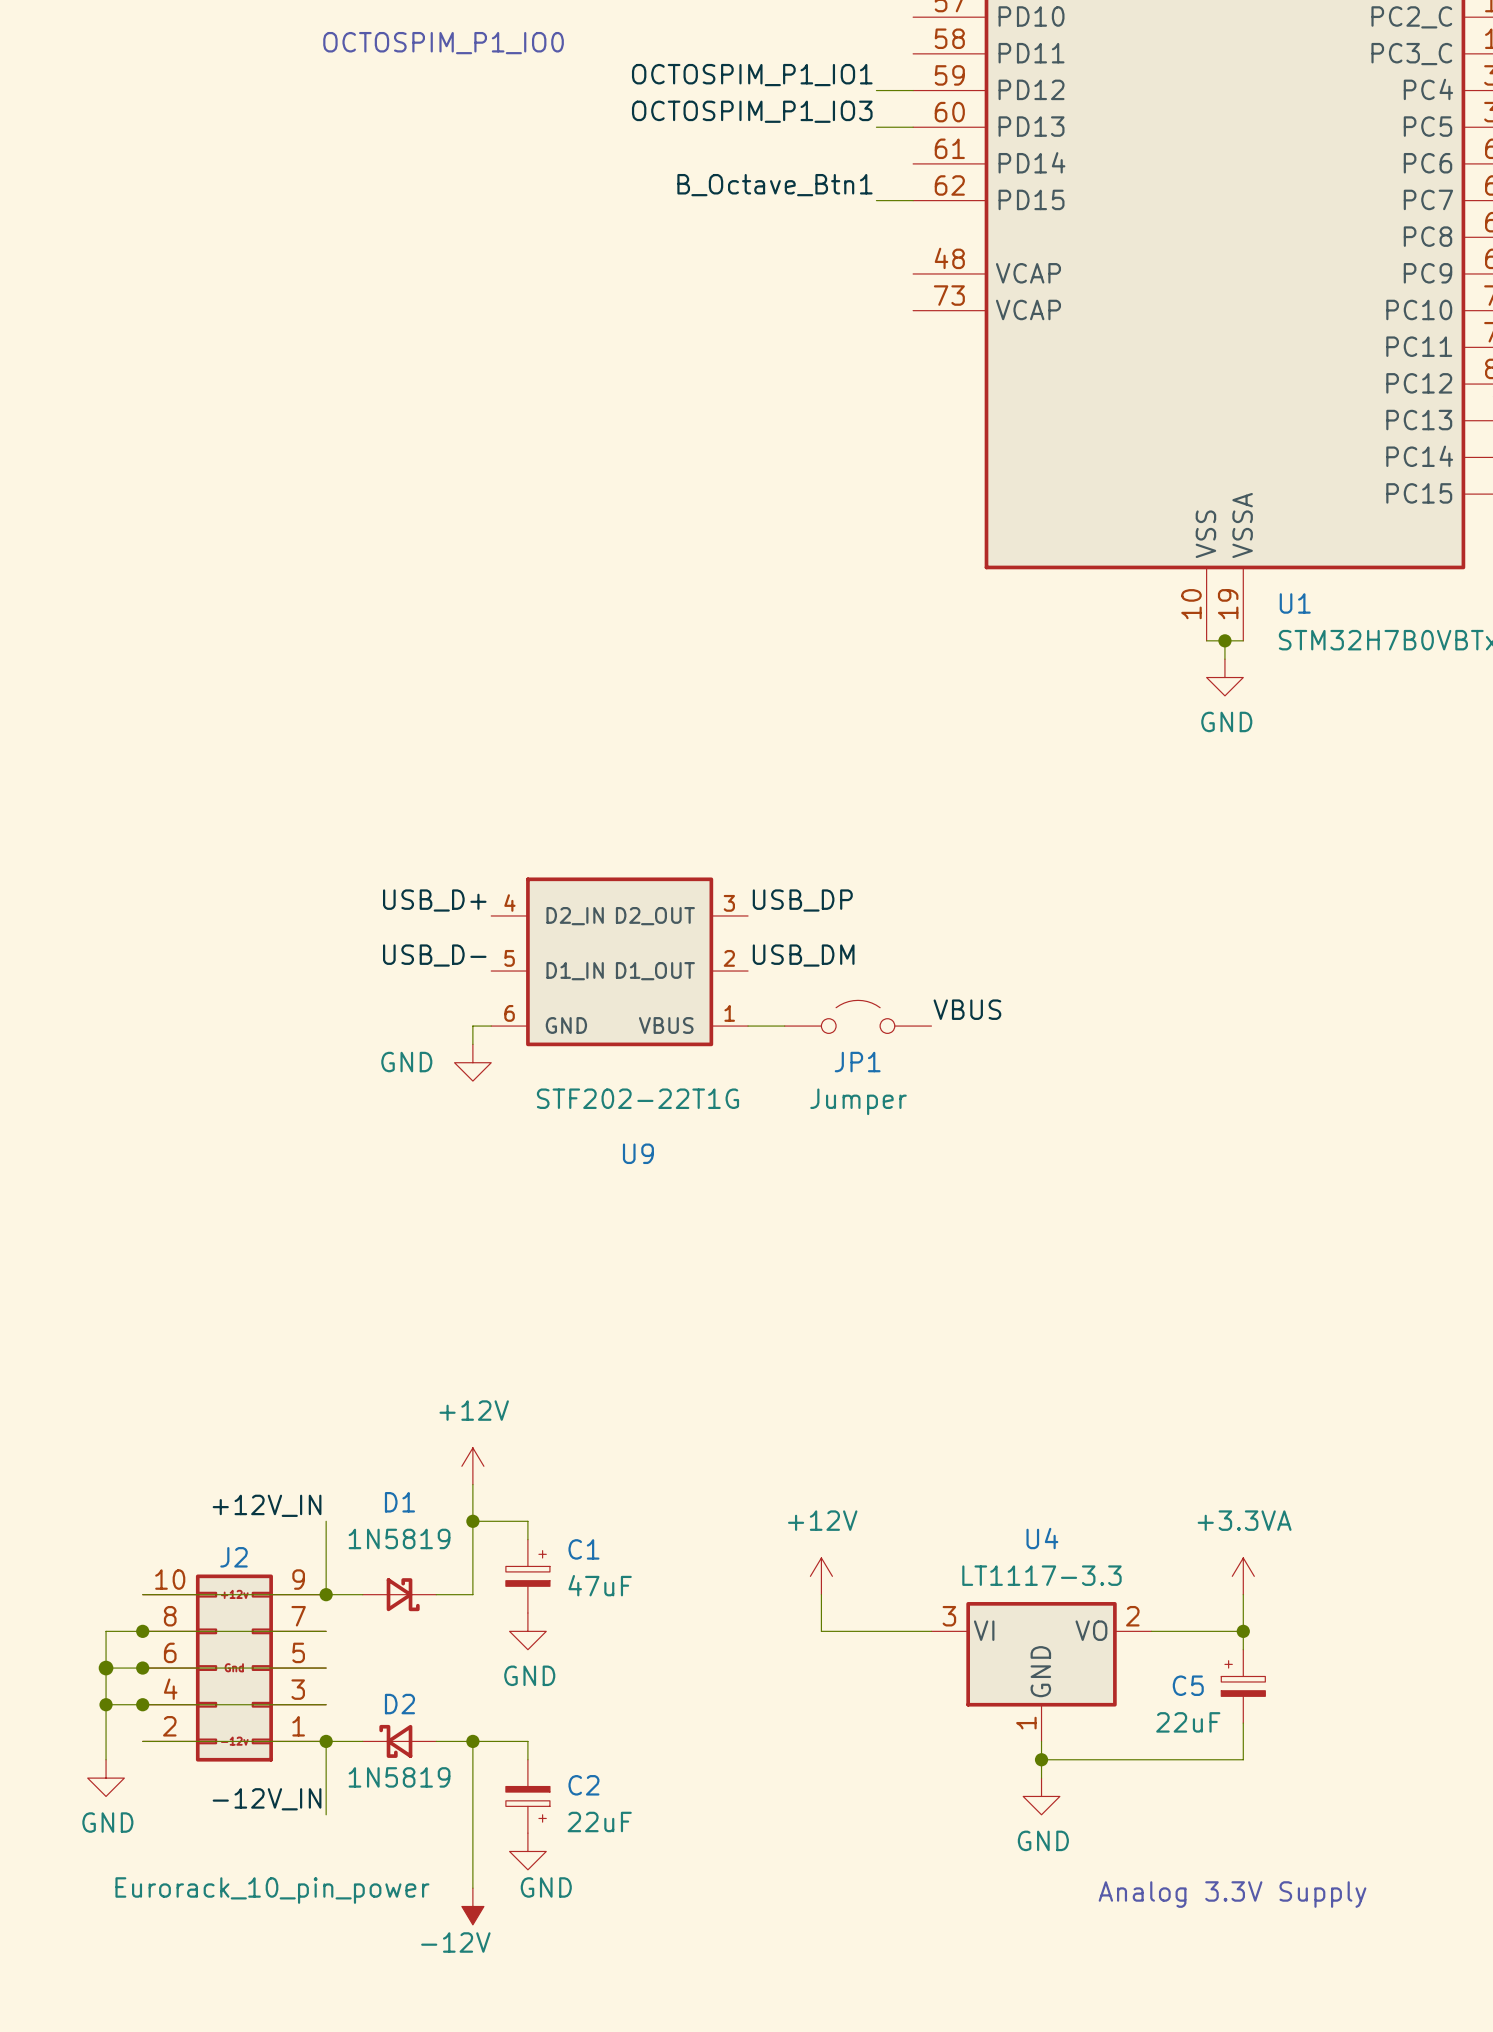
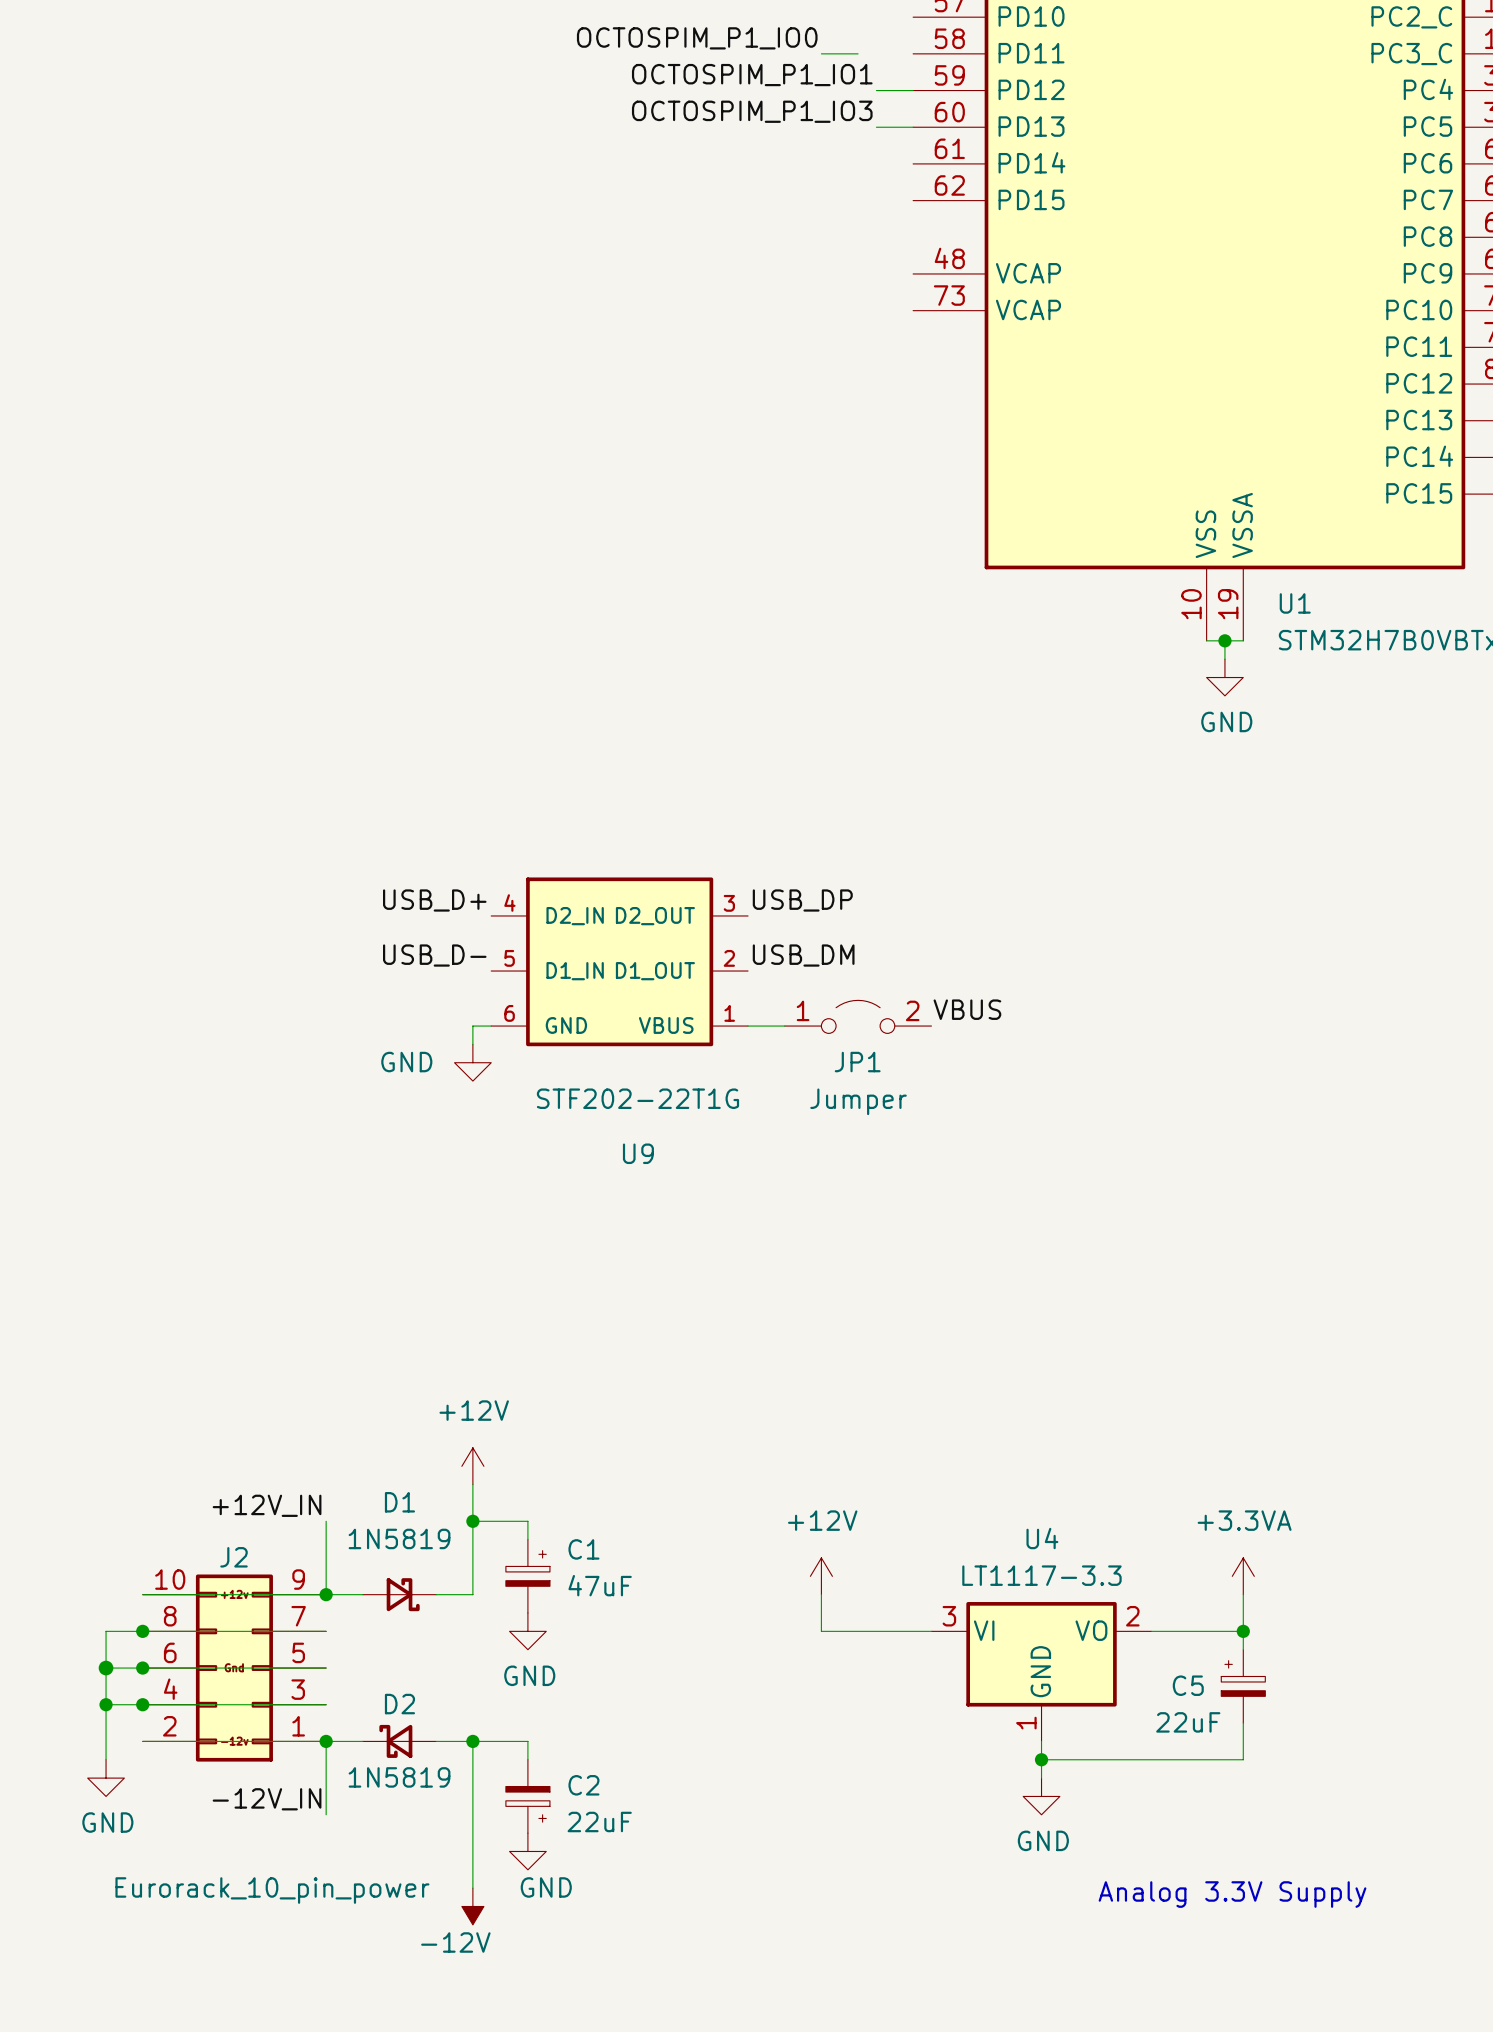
label: none -> OCTOSPIM_P1_IO0 (697, 38)
text: OCTOSPIM_P1_IO0 (443, 43) -> none
label: B_Octave_Btn1 (774, 185) -> none
wire: (876, 200) (913, 200) -> (821, 53) (858, 53)
JP1 pin number: none -> 1 (803, 1010)
JP1 pin number: none -> 2 (912, 1010)

